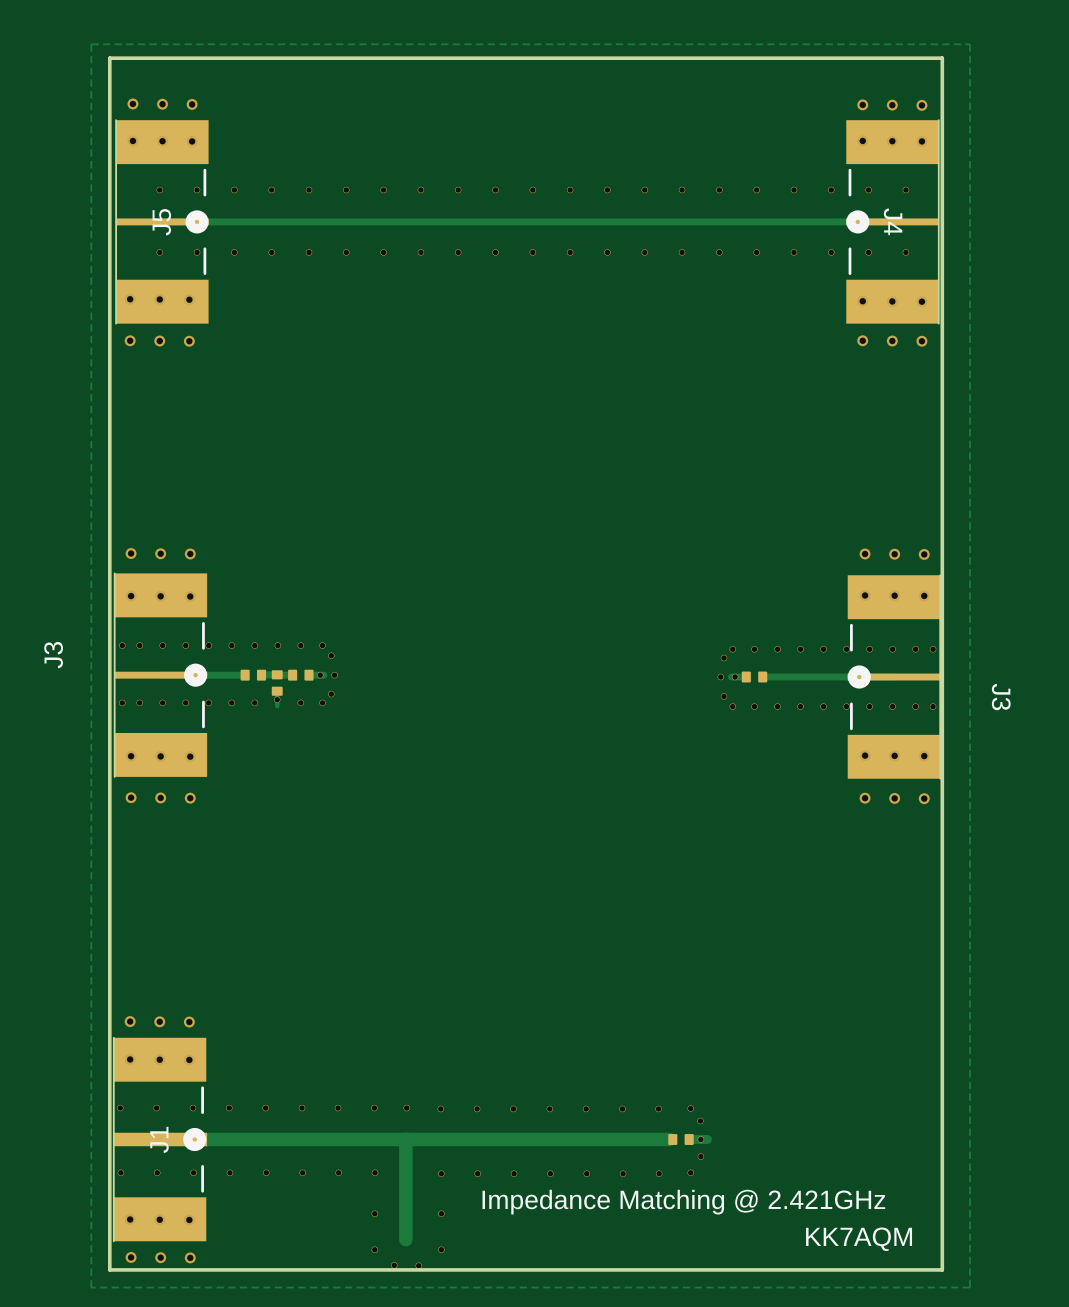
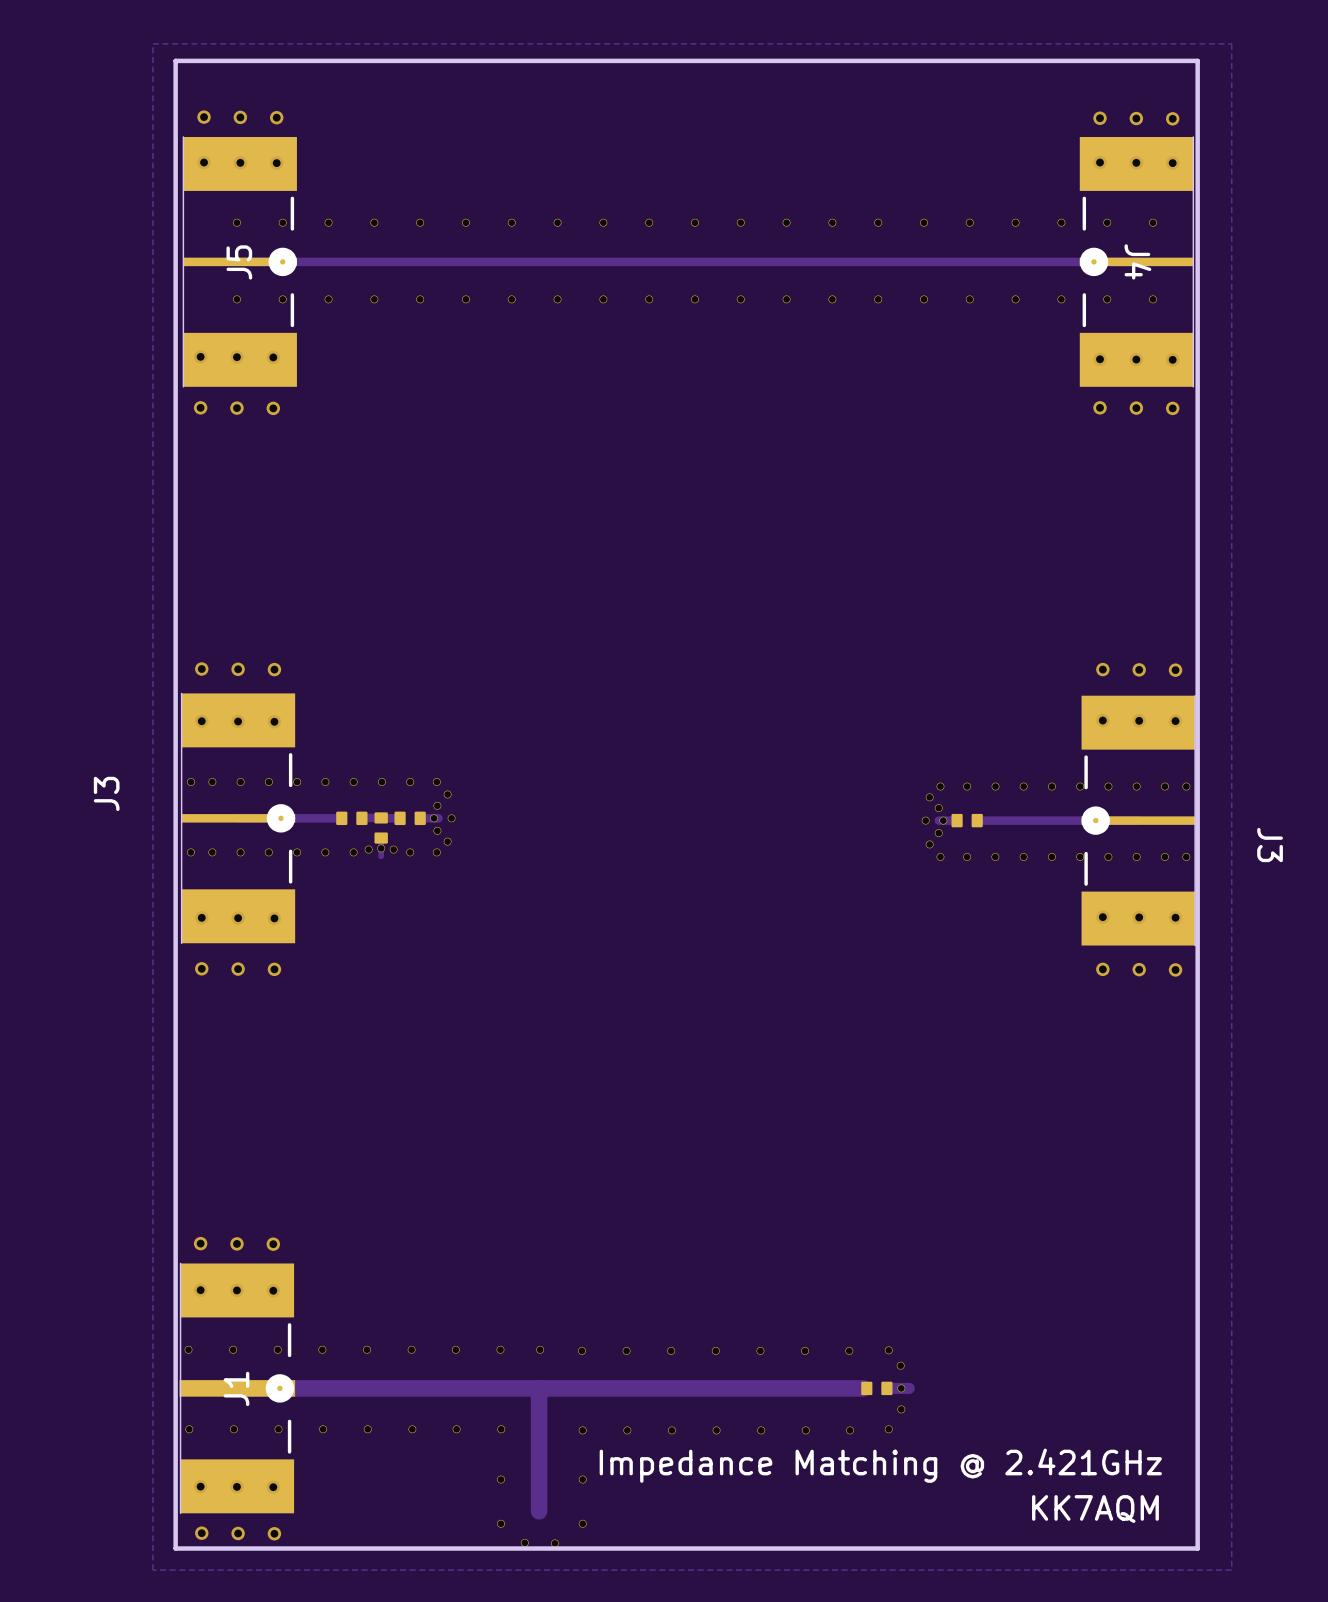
via: none -> (437, 805)
via: none -> (938, 808)
via: none -> (437, 830)
via: none -> (938, 833)
via: none -> (368, 849)
via: none -> (393, 849)

